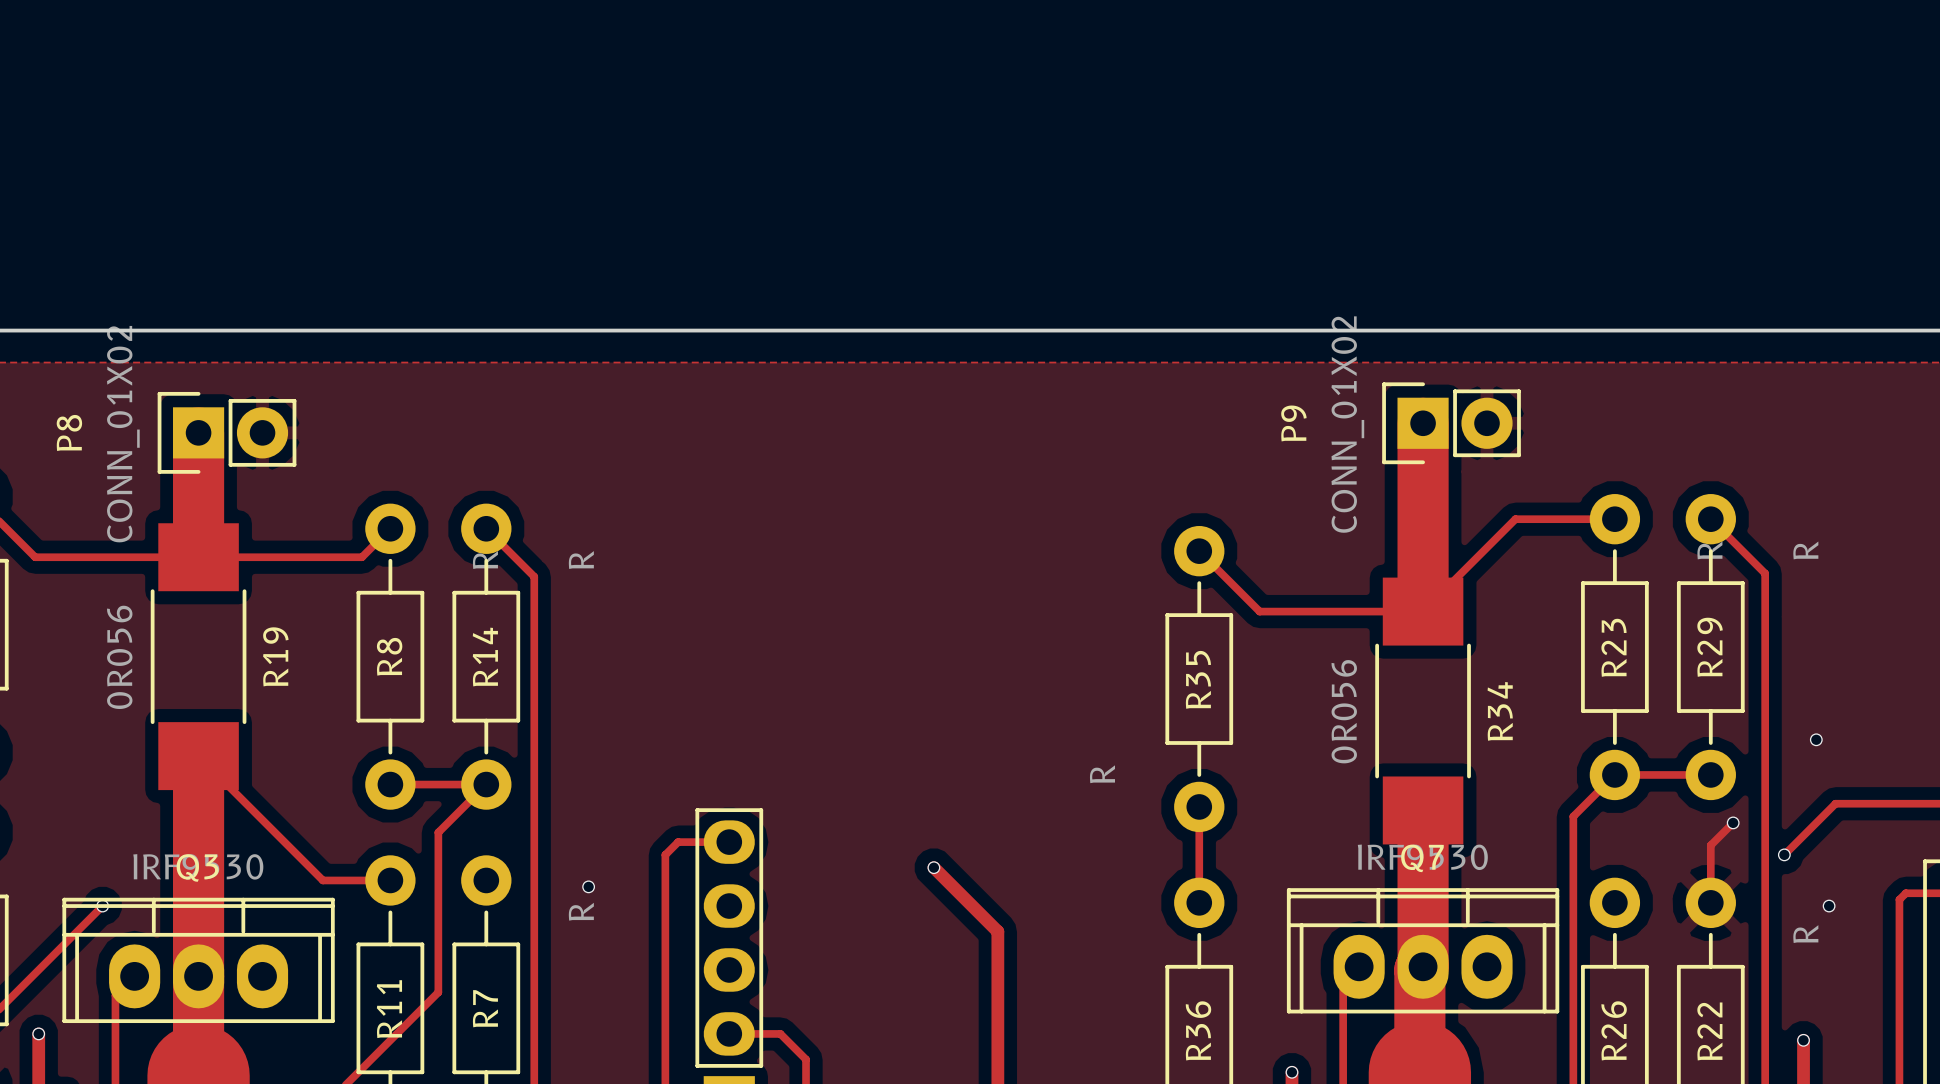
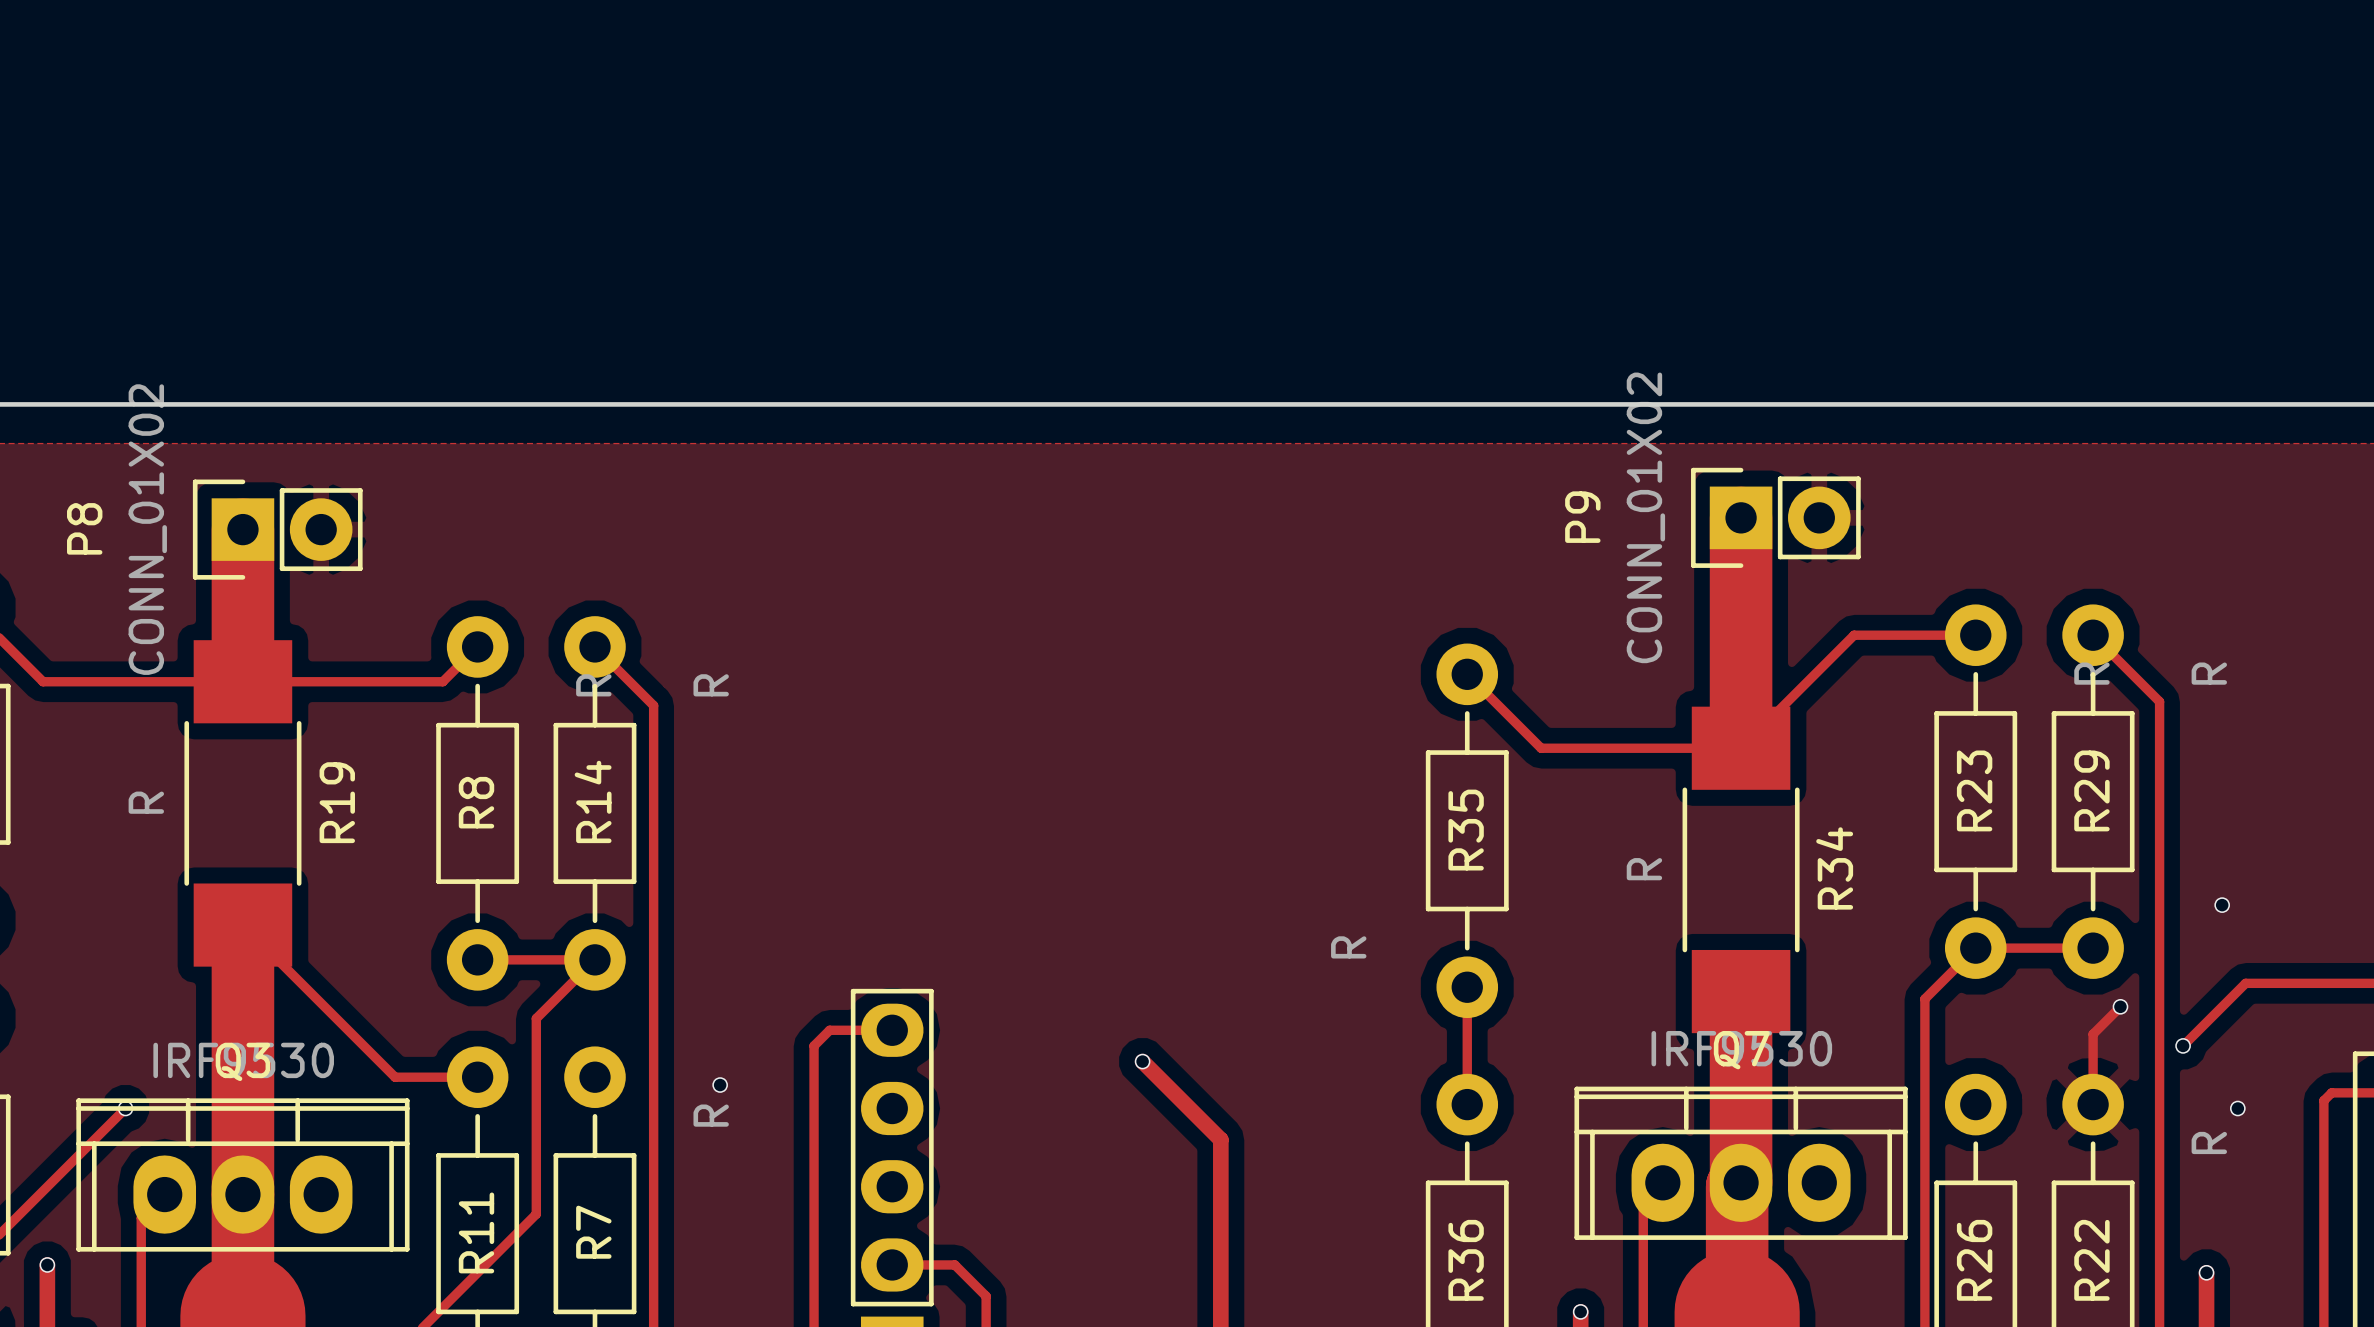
R19 value: 0R056 (119, 657) -> R (146, 802)
R34 value: 0R056 (1344, 711) -> R (1644, 869)

